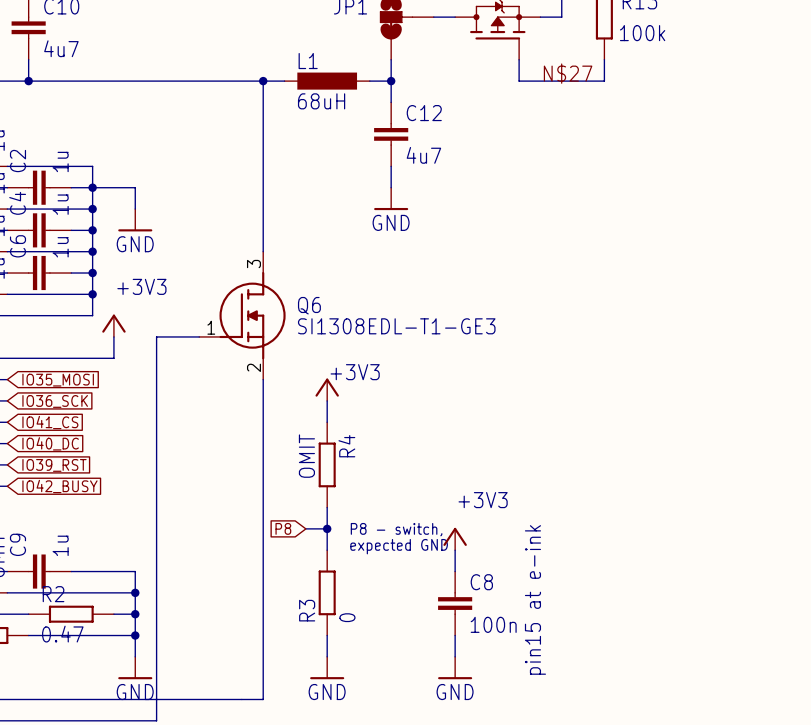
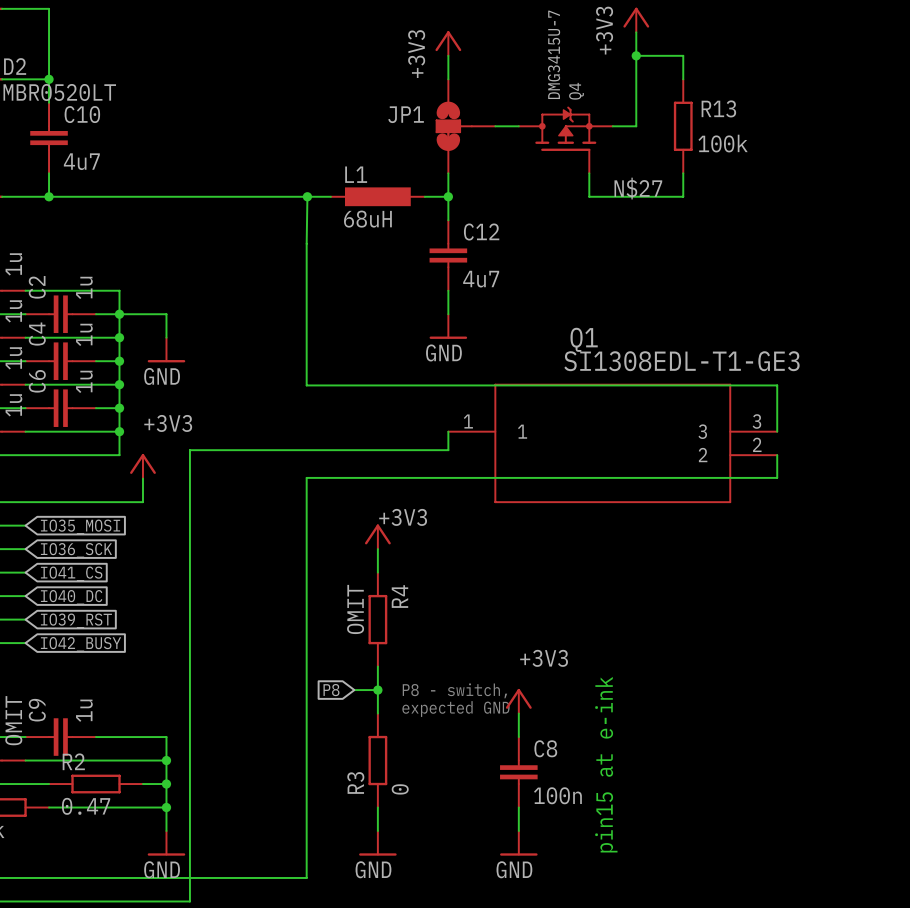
wire: (263, 81) (263, 251) -> (307, 196) (306, 385) (777, 385) (777, 431)
Q1: none -> SI1308EDL-T1-GE3 (612, 443)
Q6: SI1308EDL-T1-GE3 (242, 315) -> none
wire: (156, 336) (199, 336) -> (189, 478) (189, 450) (448, 450) (448, 431)
wire: (263, 379) (262, 699) -> (777, 455) (777, 477) (306, 477) (306, 877)

